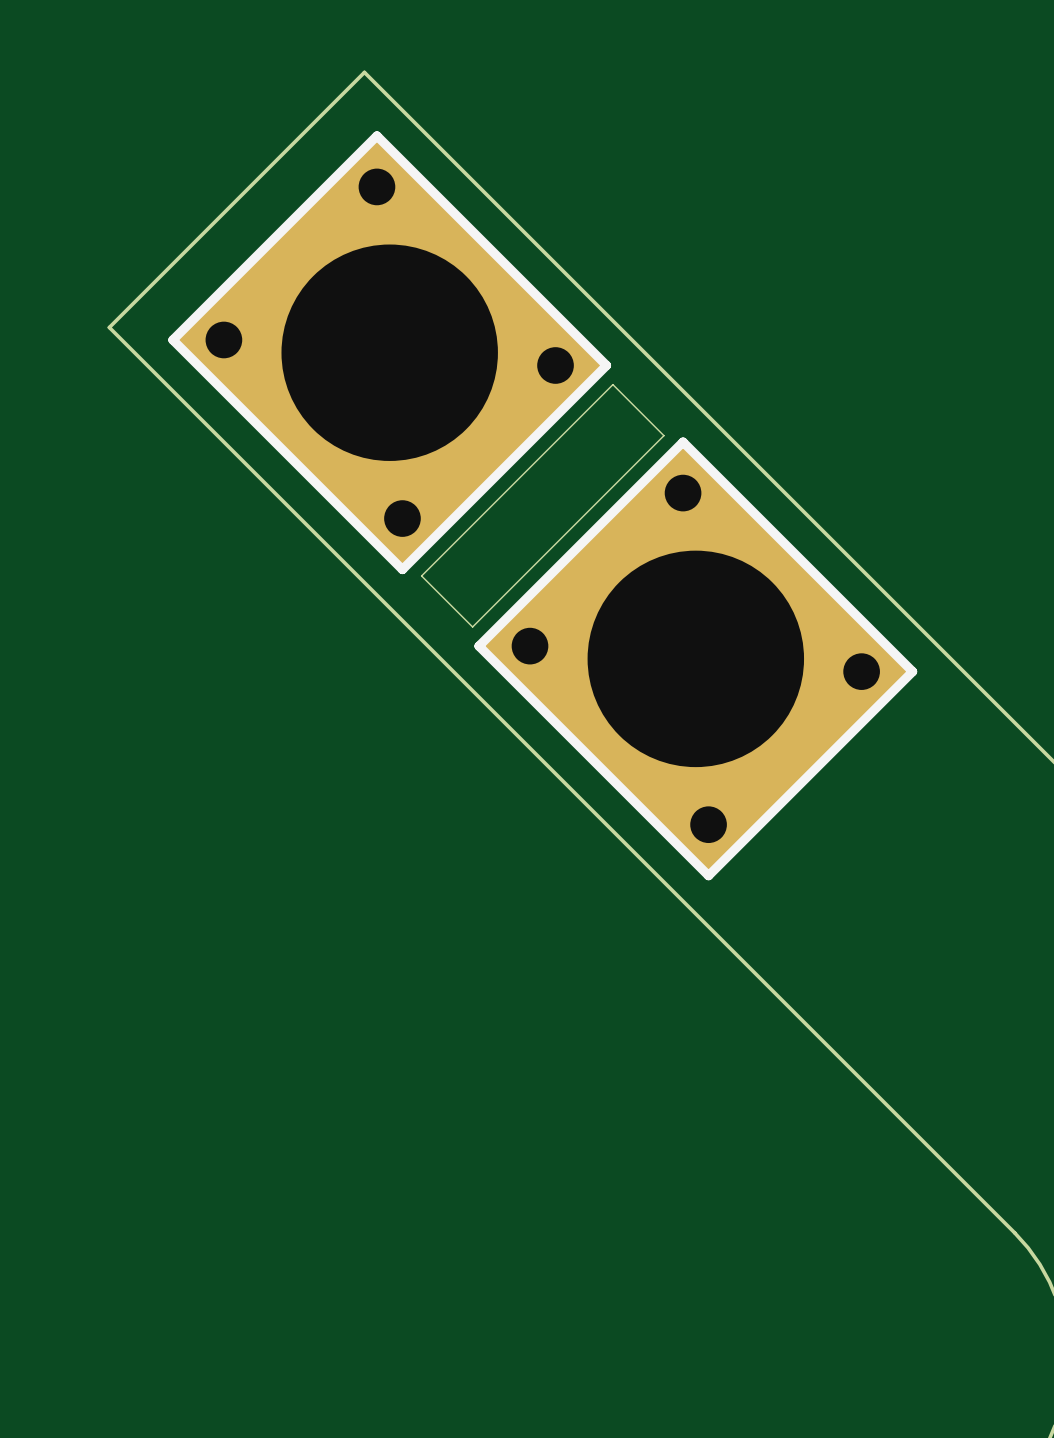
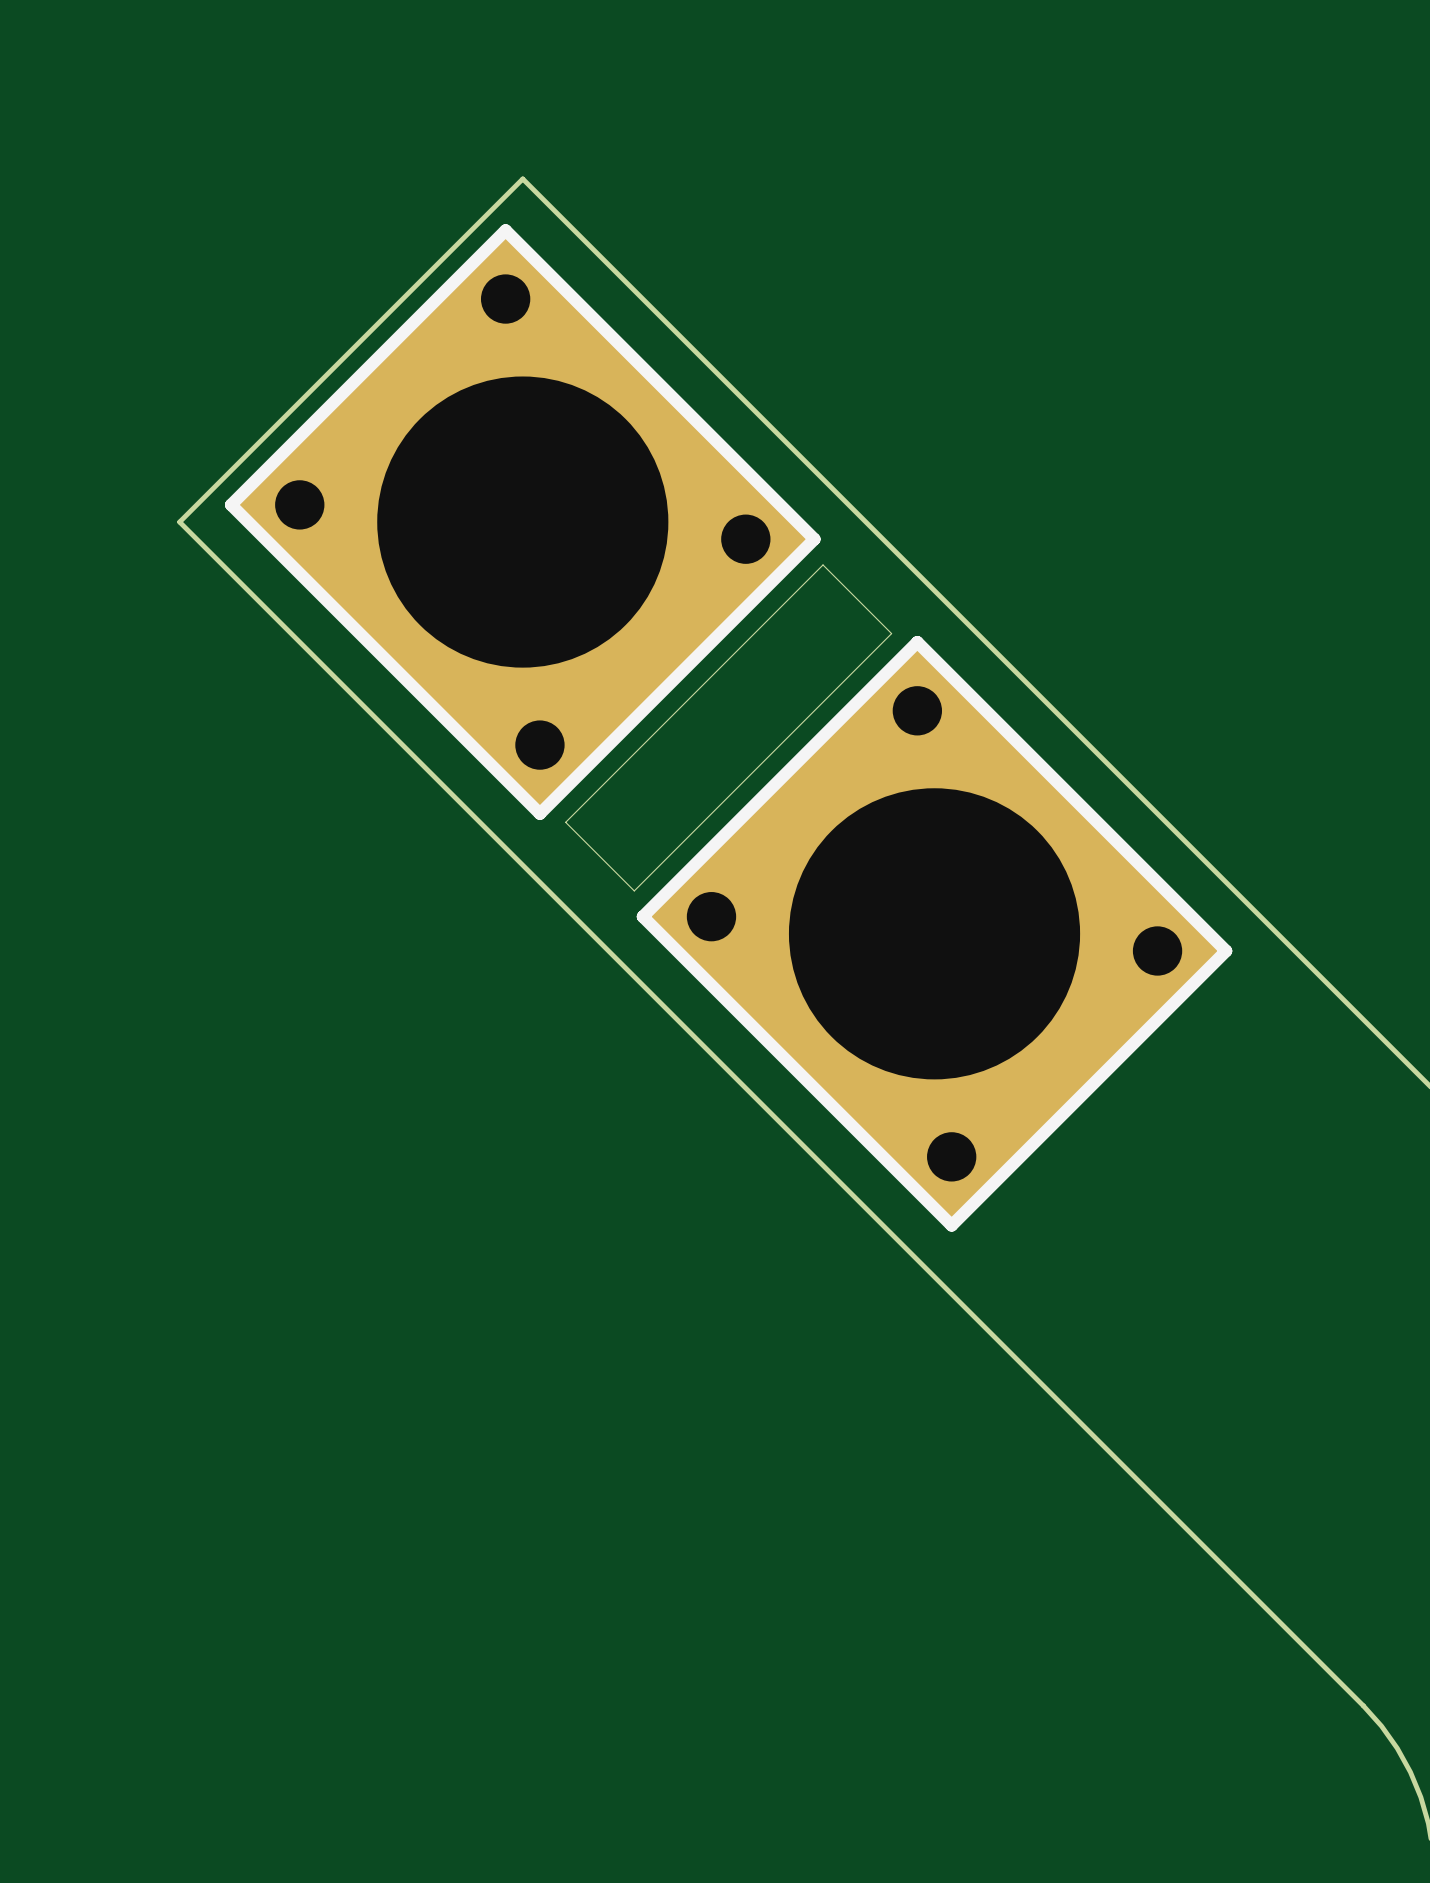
board edge: (389, 97) (364, 72) (109, 327) (134, 352) -> (522, 178) (179, 522)

